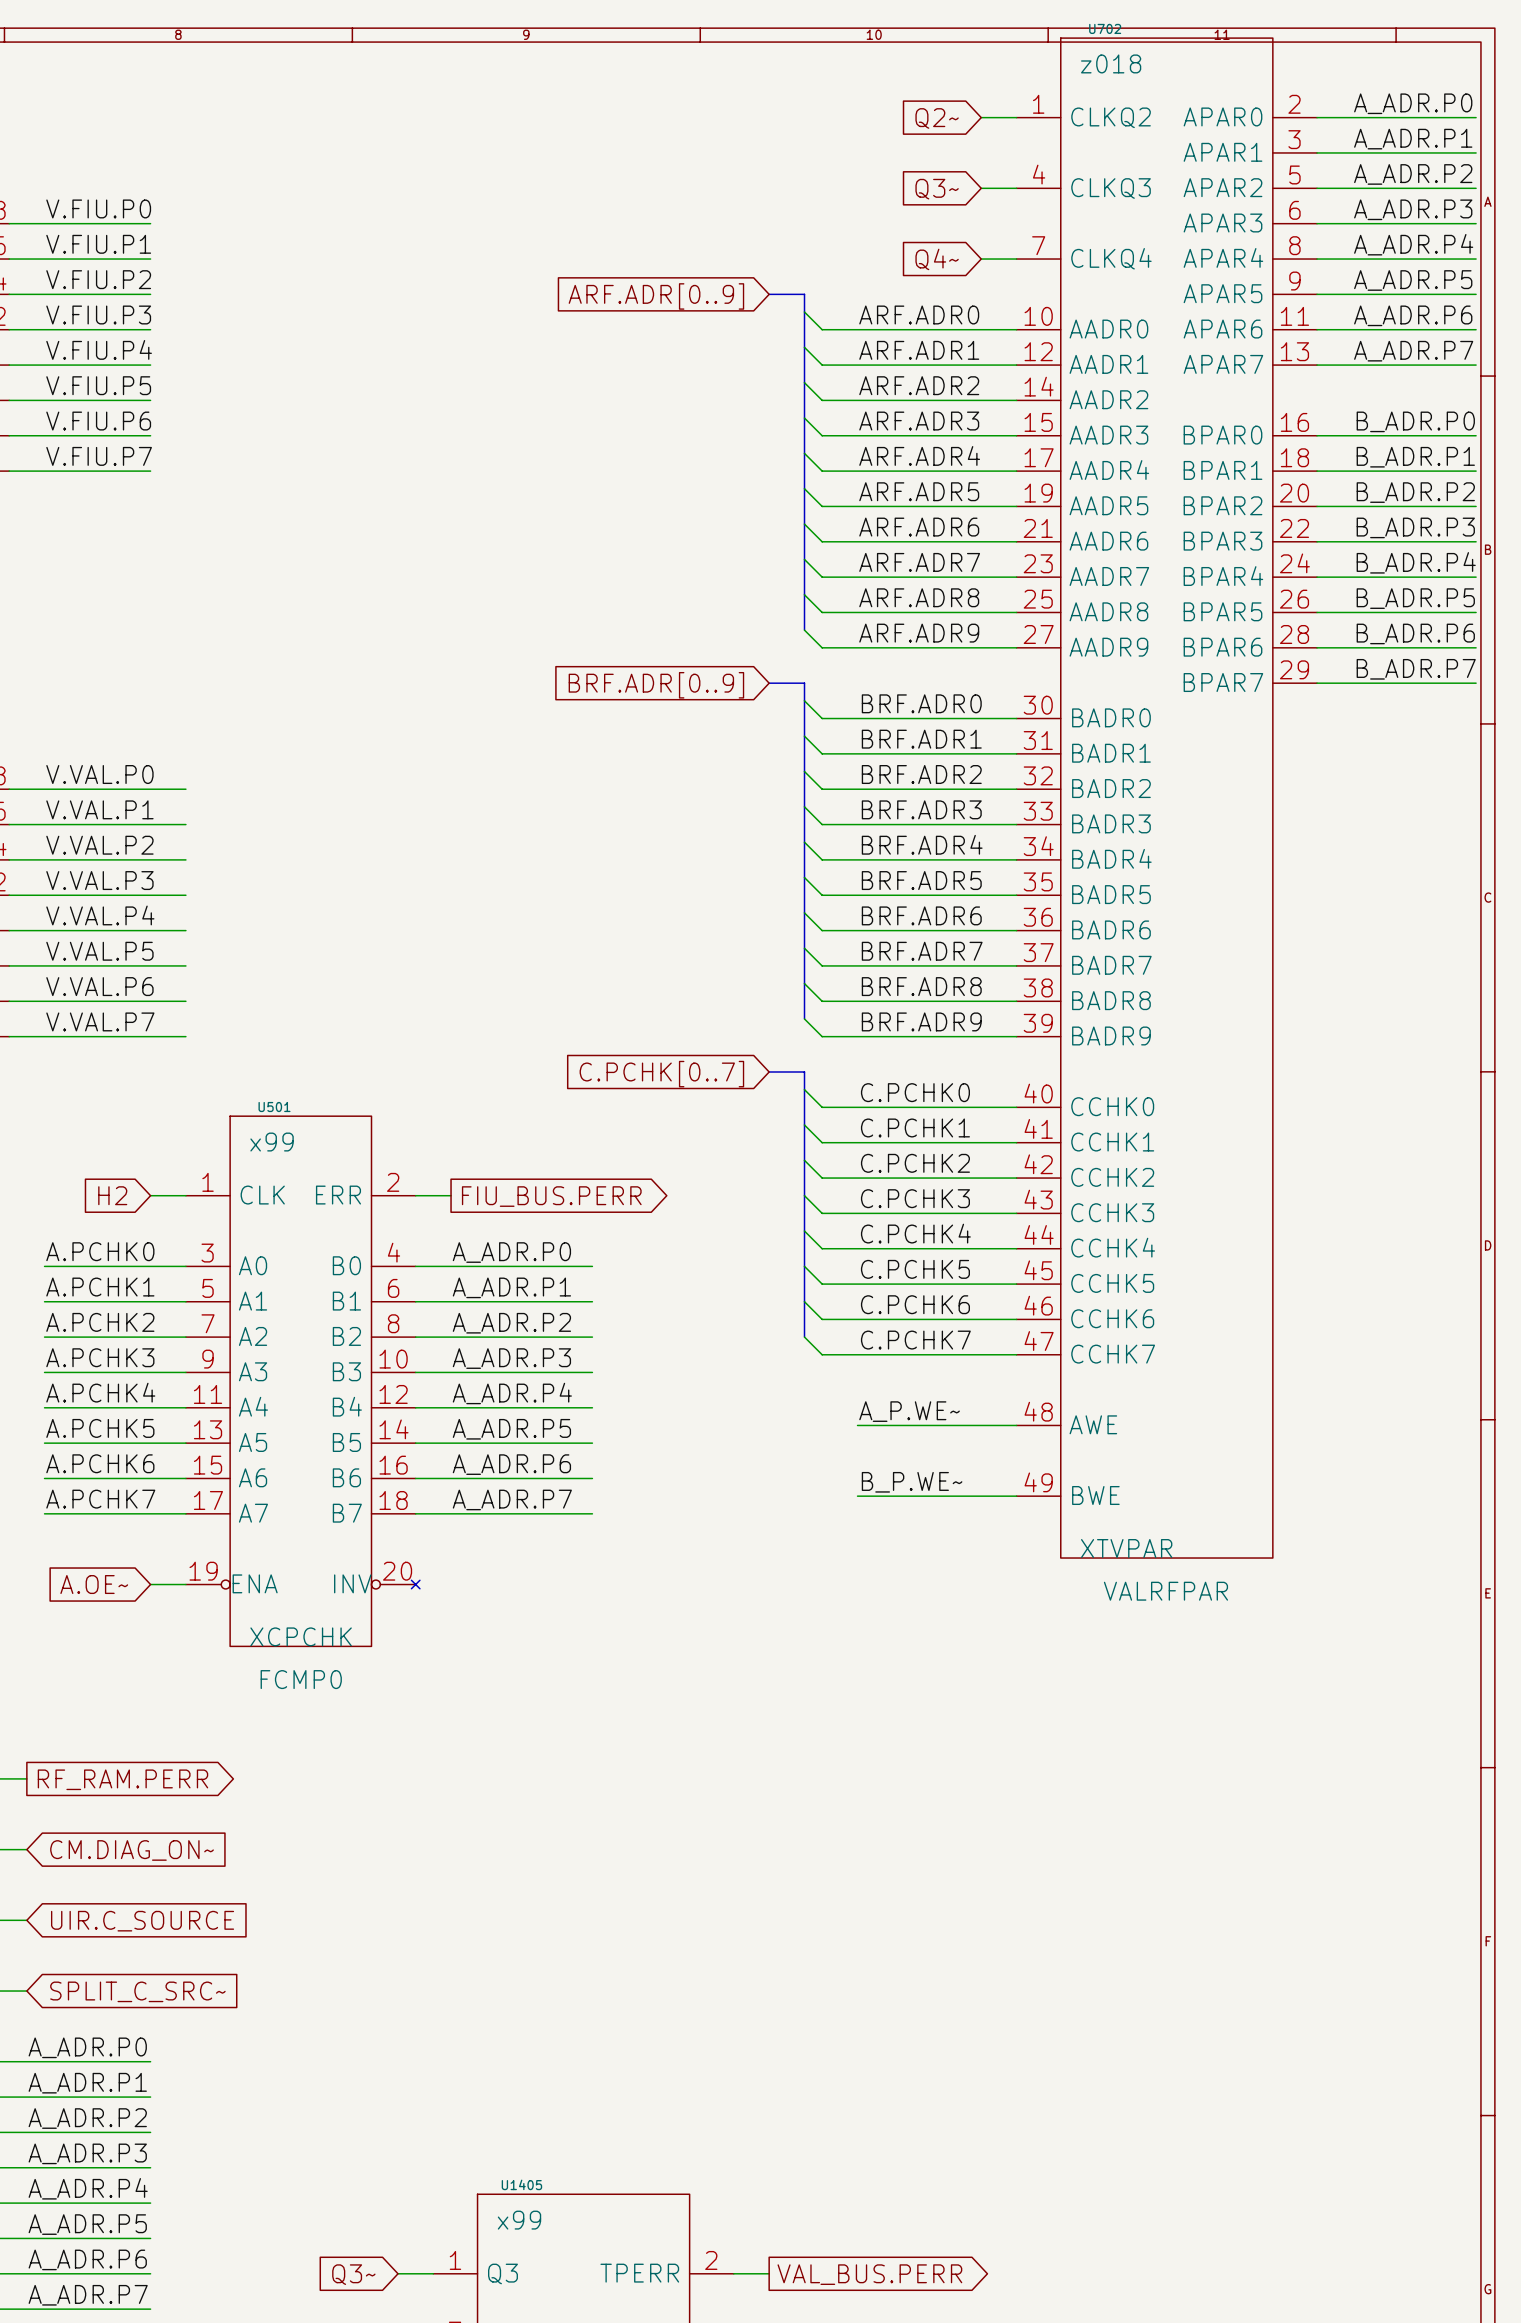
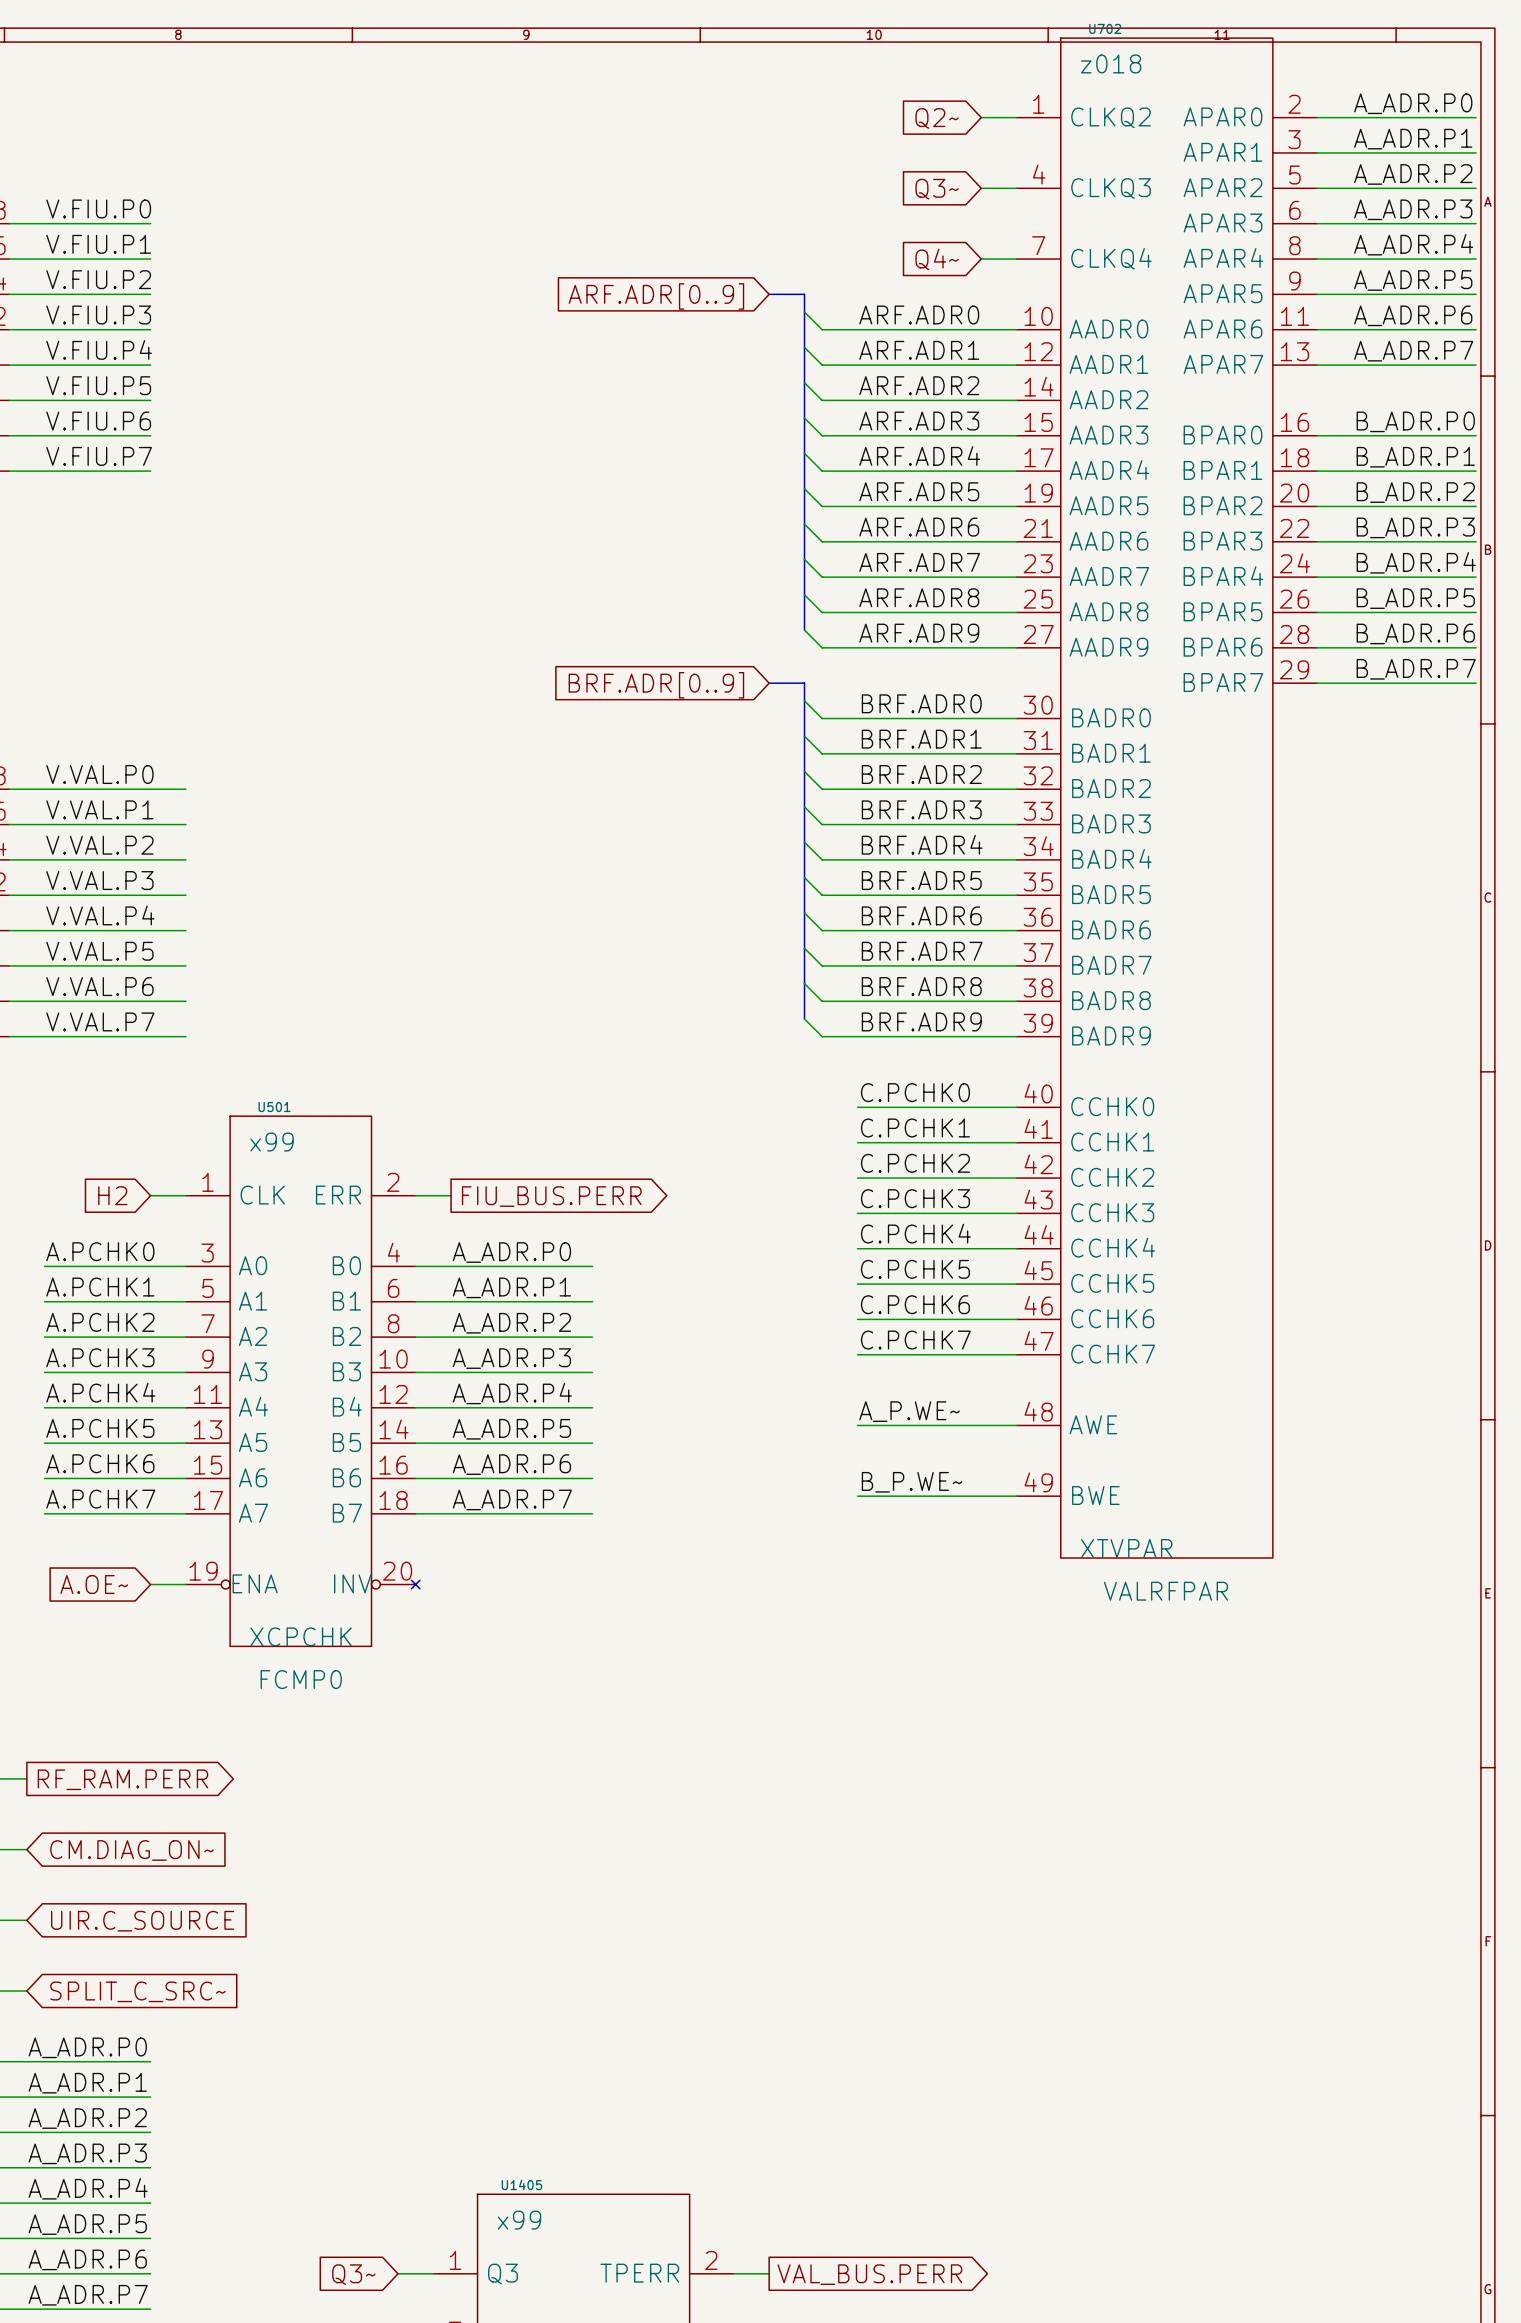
bus: (769, 1071) (804, 1071) (804, 1337) -> none
global label: C.PCHK[0..7] (661, 1074) -> none
wire: (804, 1089) (822, 1107) (857, 1107) -> none
wire: (804, 1125) (822, 1142) (857, 1142) -> none
wire: (804, 1160) (822, 1178) (857, 1178) -> none
wire: (804, 1195) (822, 1213) (857, 1213) -> none
wire: (804, 1231) (822, 1248) (857, 1248) -> none
wire: (804, 1266) (822, 1284) (857, 1284) -> none
wire: (804, 1301) (822, 1319) (857, 1319) -> none
wire: (804, 1337) (822, 1354) (857, 1354) -> none

